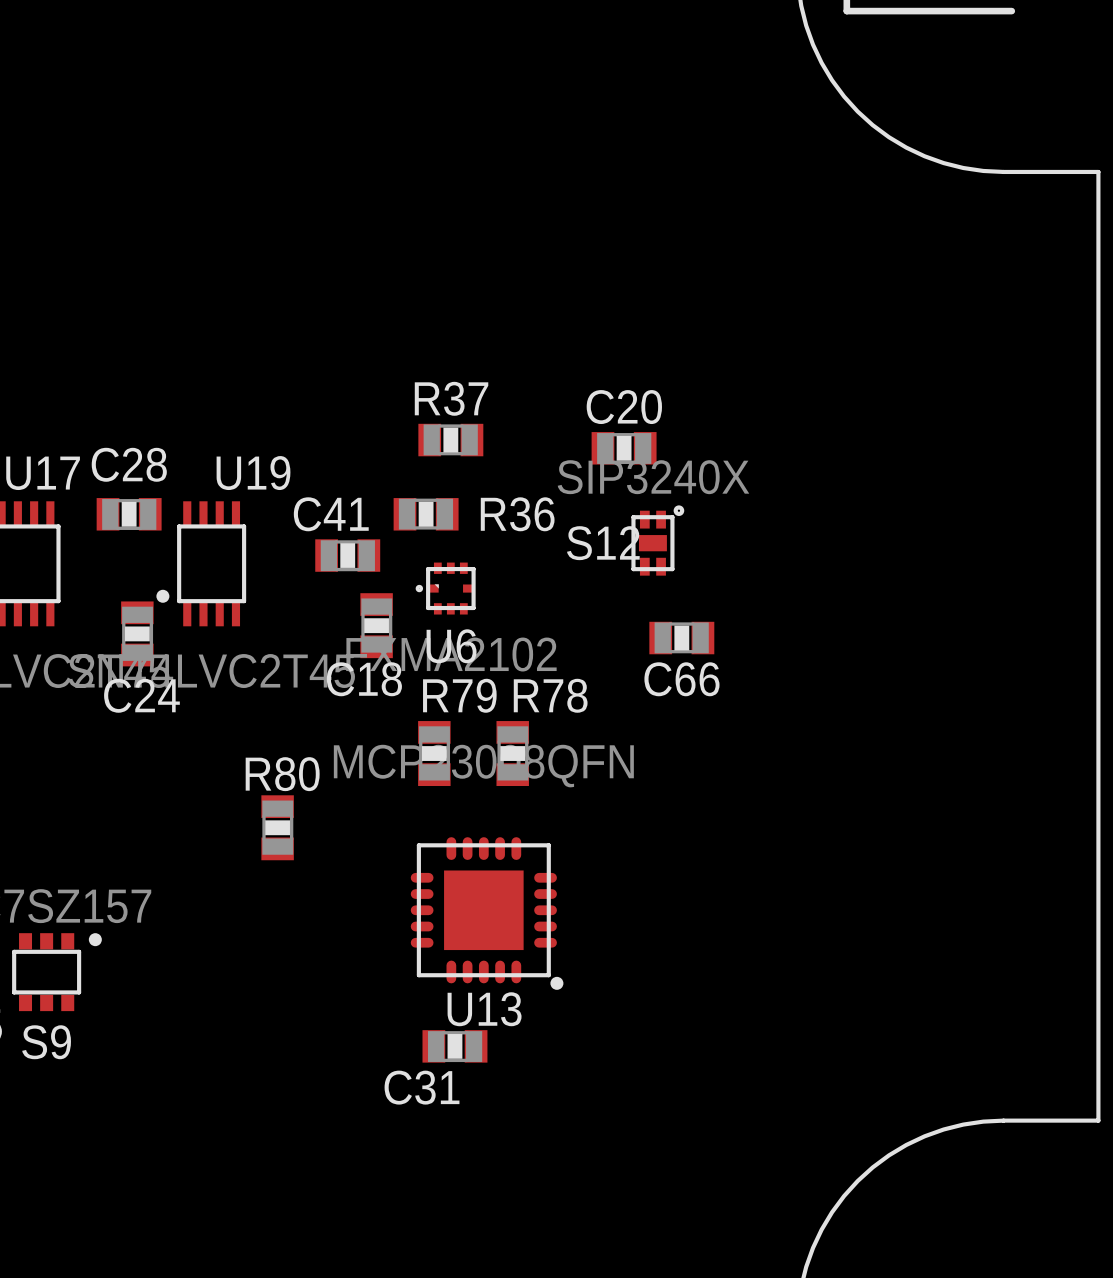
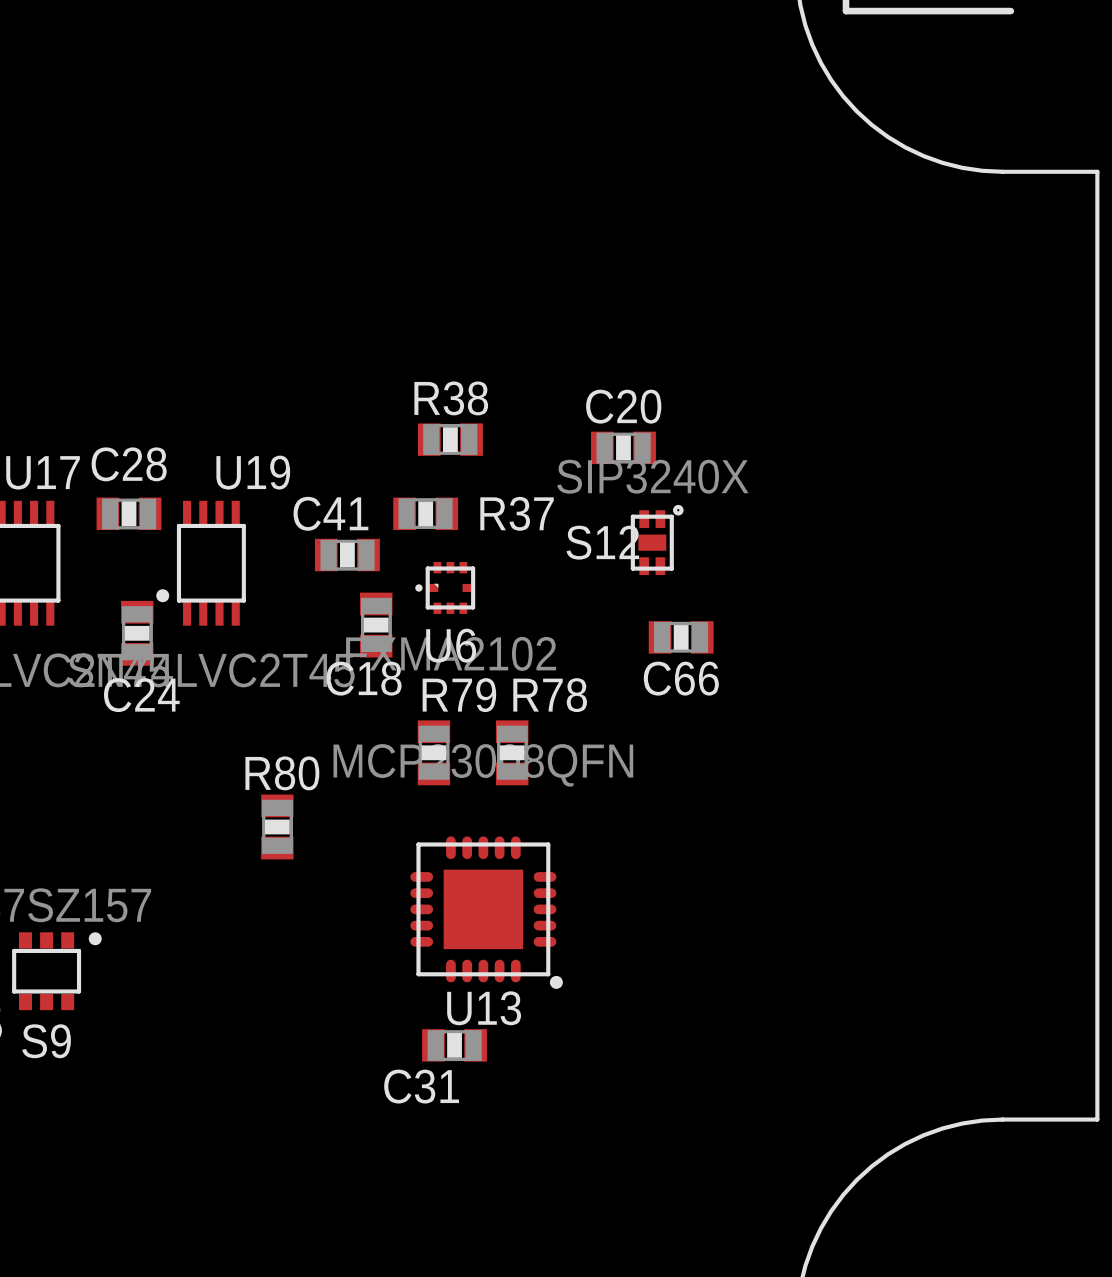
R37 name: R37 (451, 398) -> R38 (451, 398)
R36 name: R36 (517, 514) -> R37 (517, 513)

